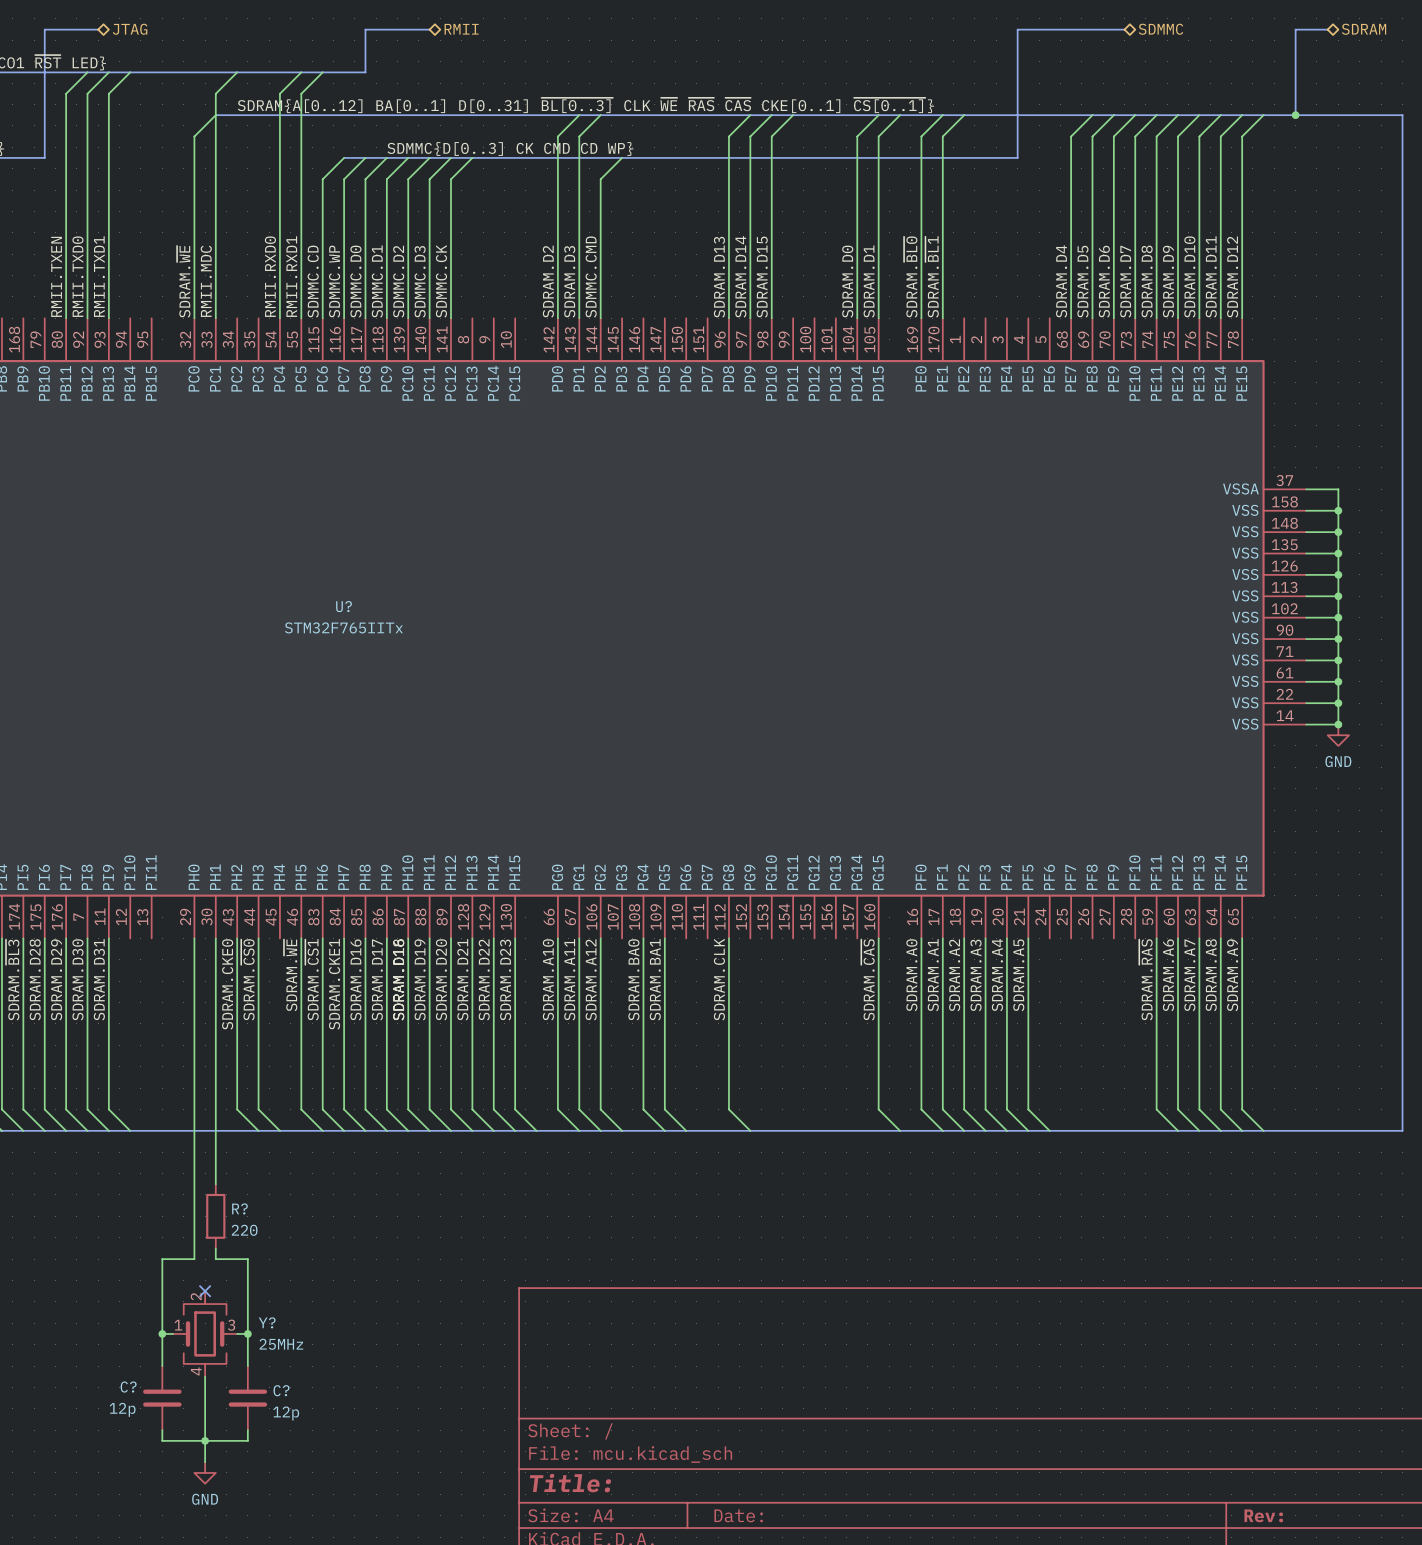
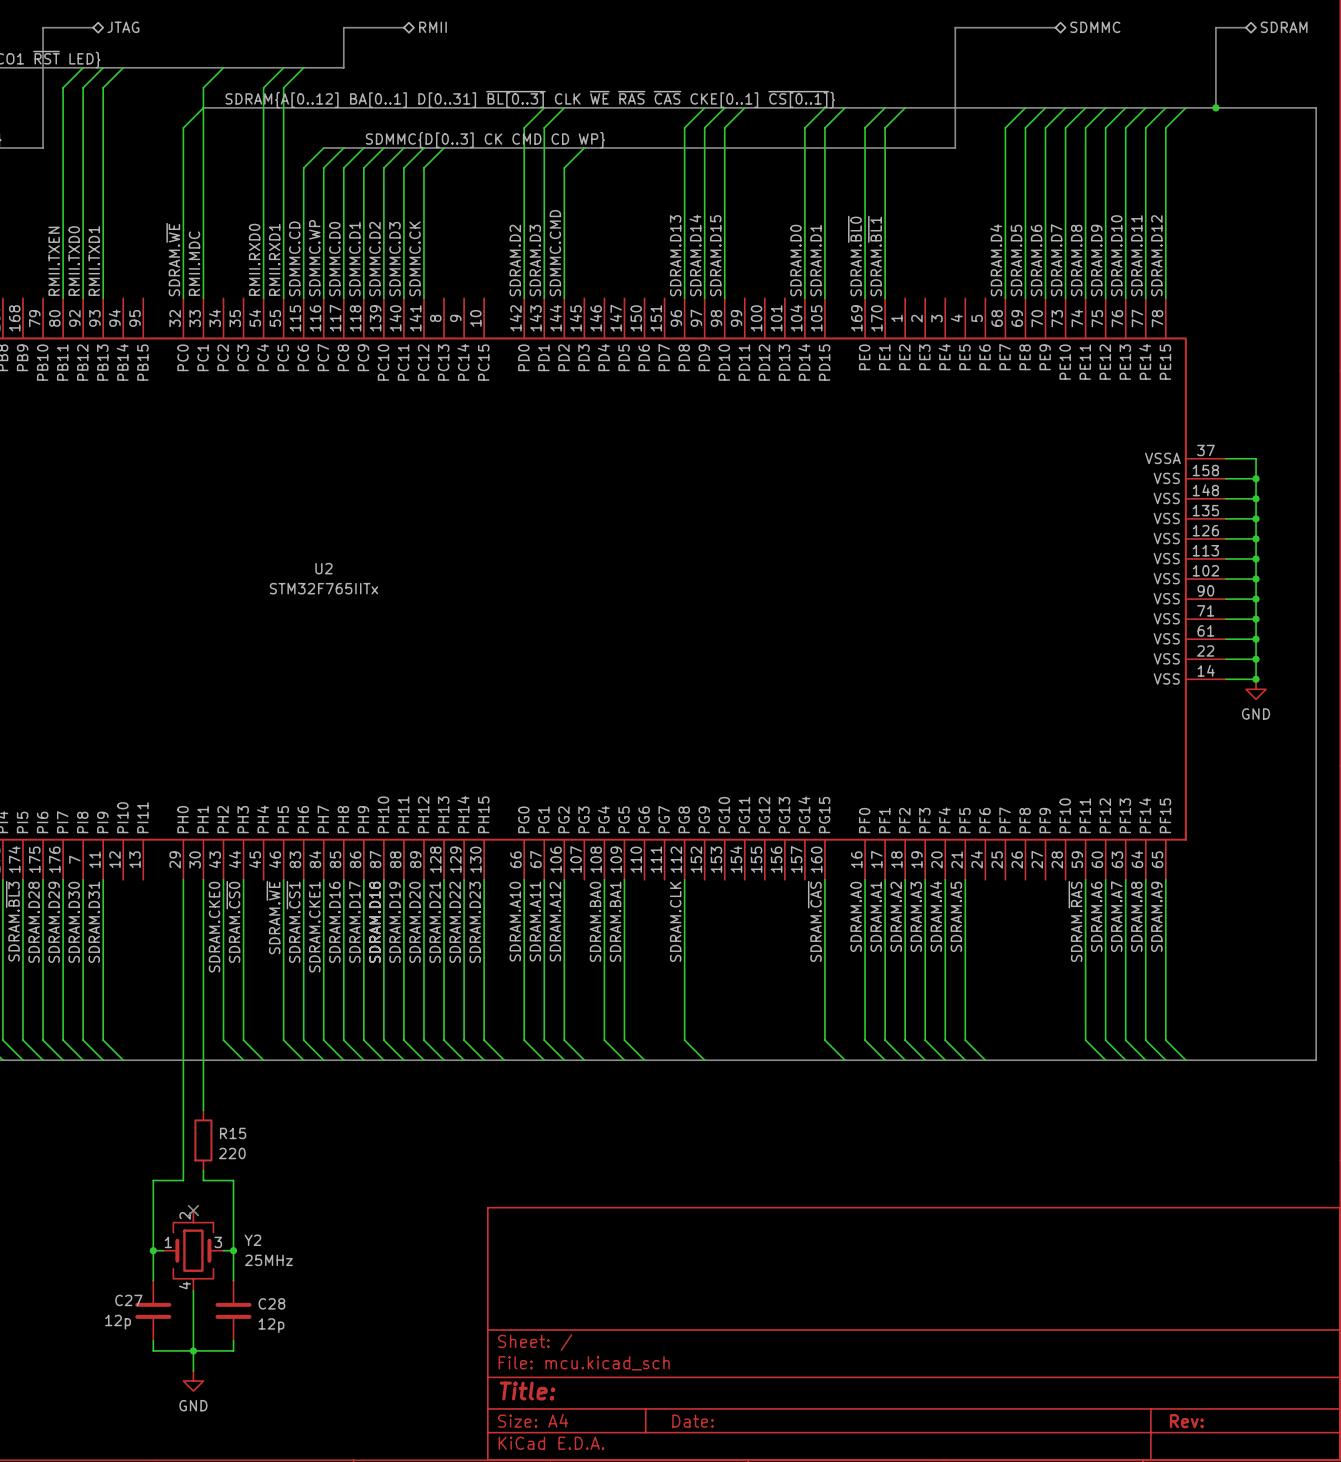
U? name: U? (344, 606) -> U2 (323, 568)
R? name: R? (239, 1208) -> R15 (233, 1133)
Y? name: Y? (267, 1322) -> Y2 (252, 1240)
C? name: C? (128, 1387) -> C27 (128, 1300)
C? name: C? (281, 1390) -> C28 (271, 1303)

